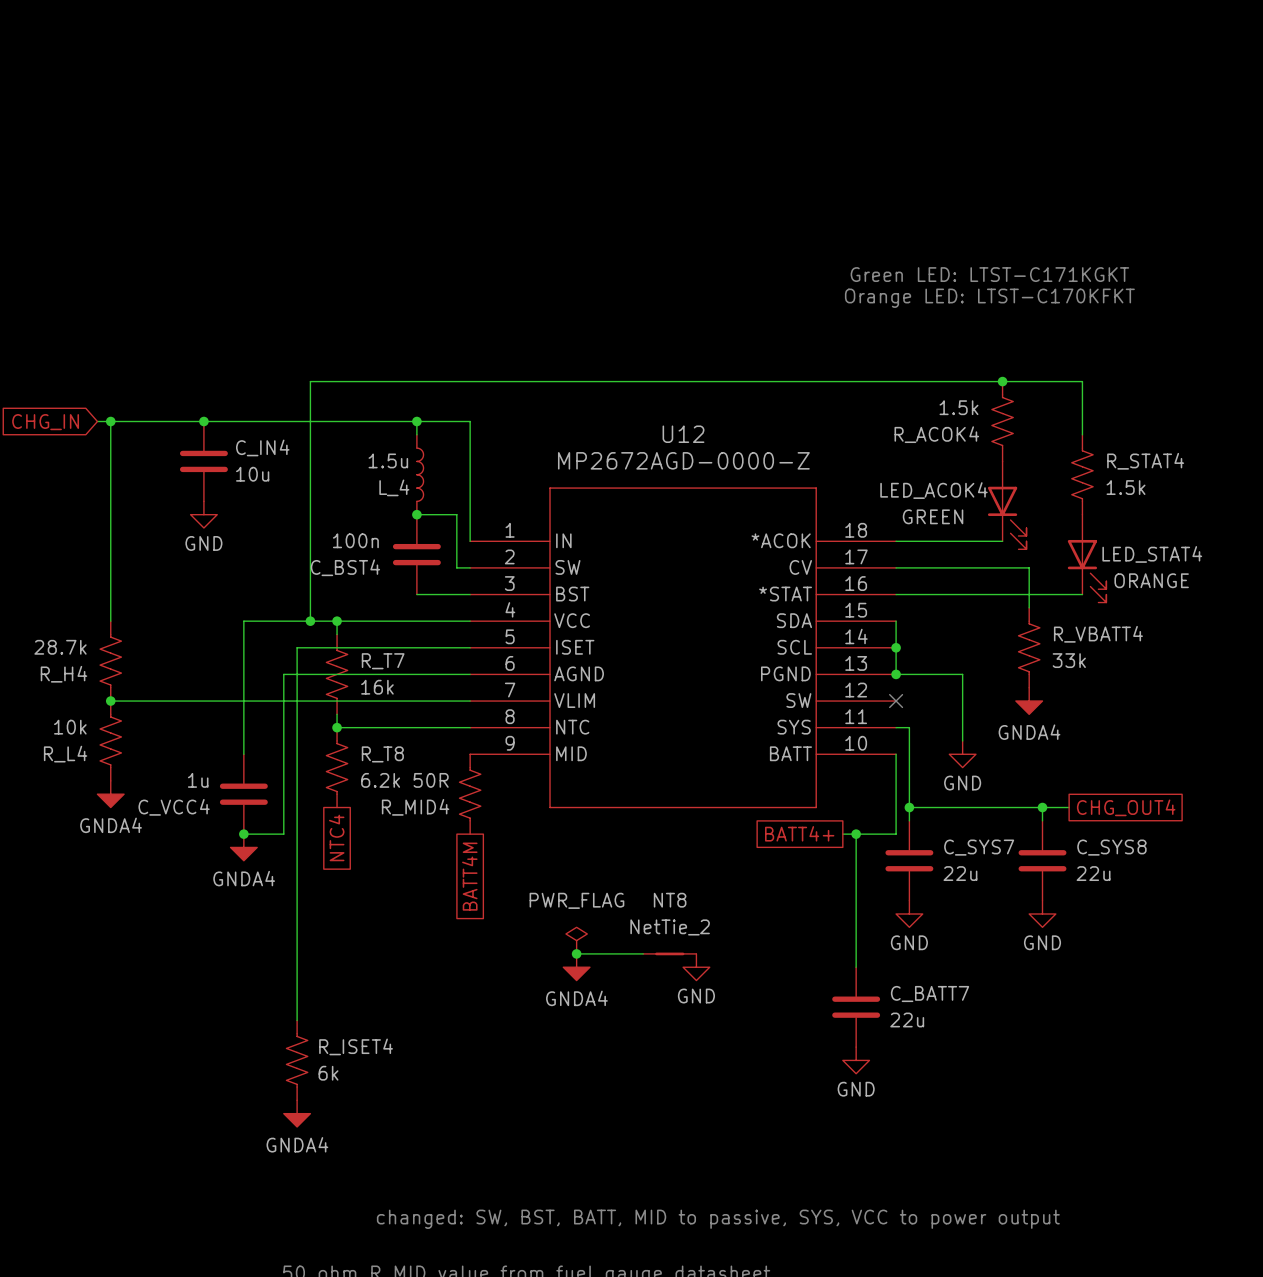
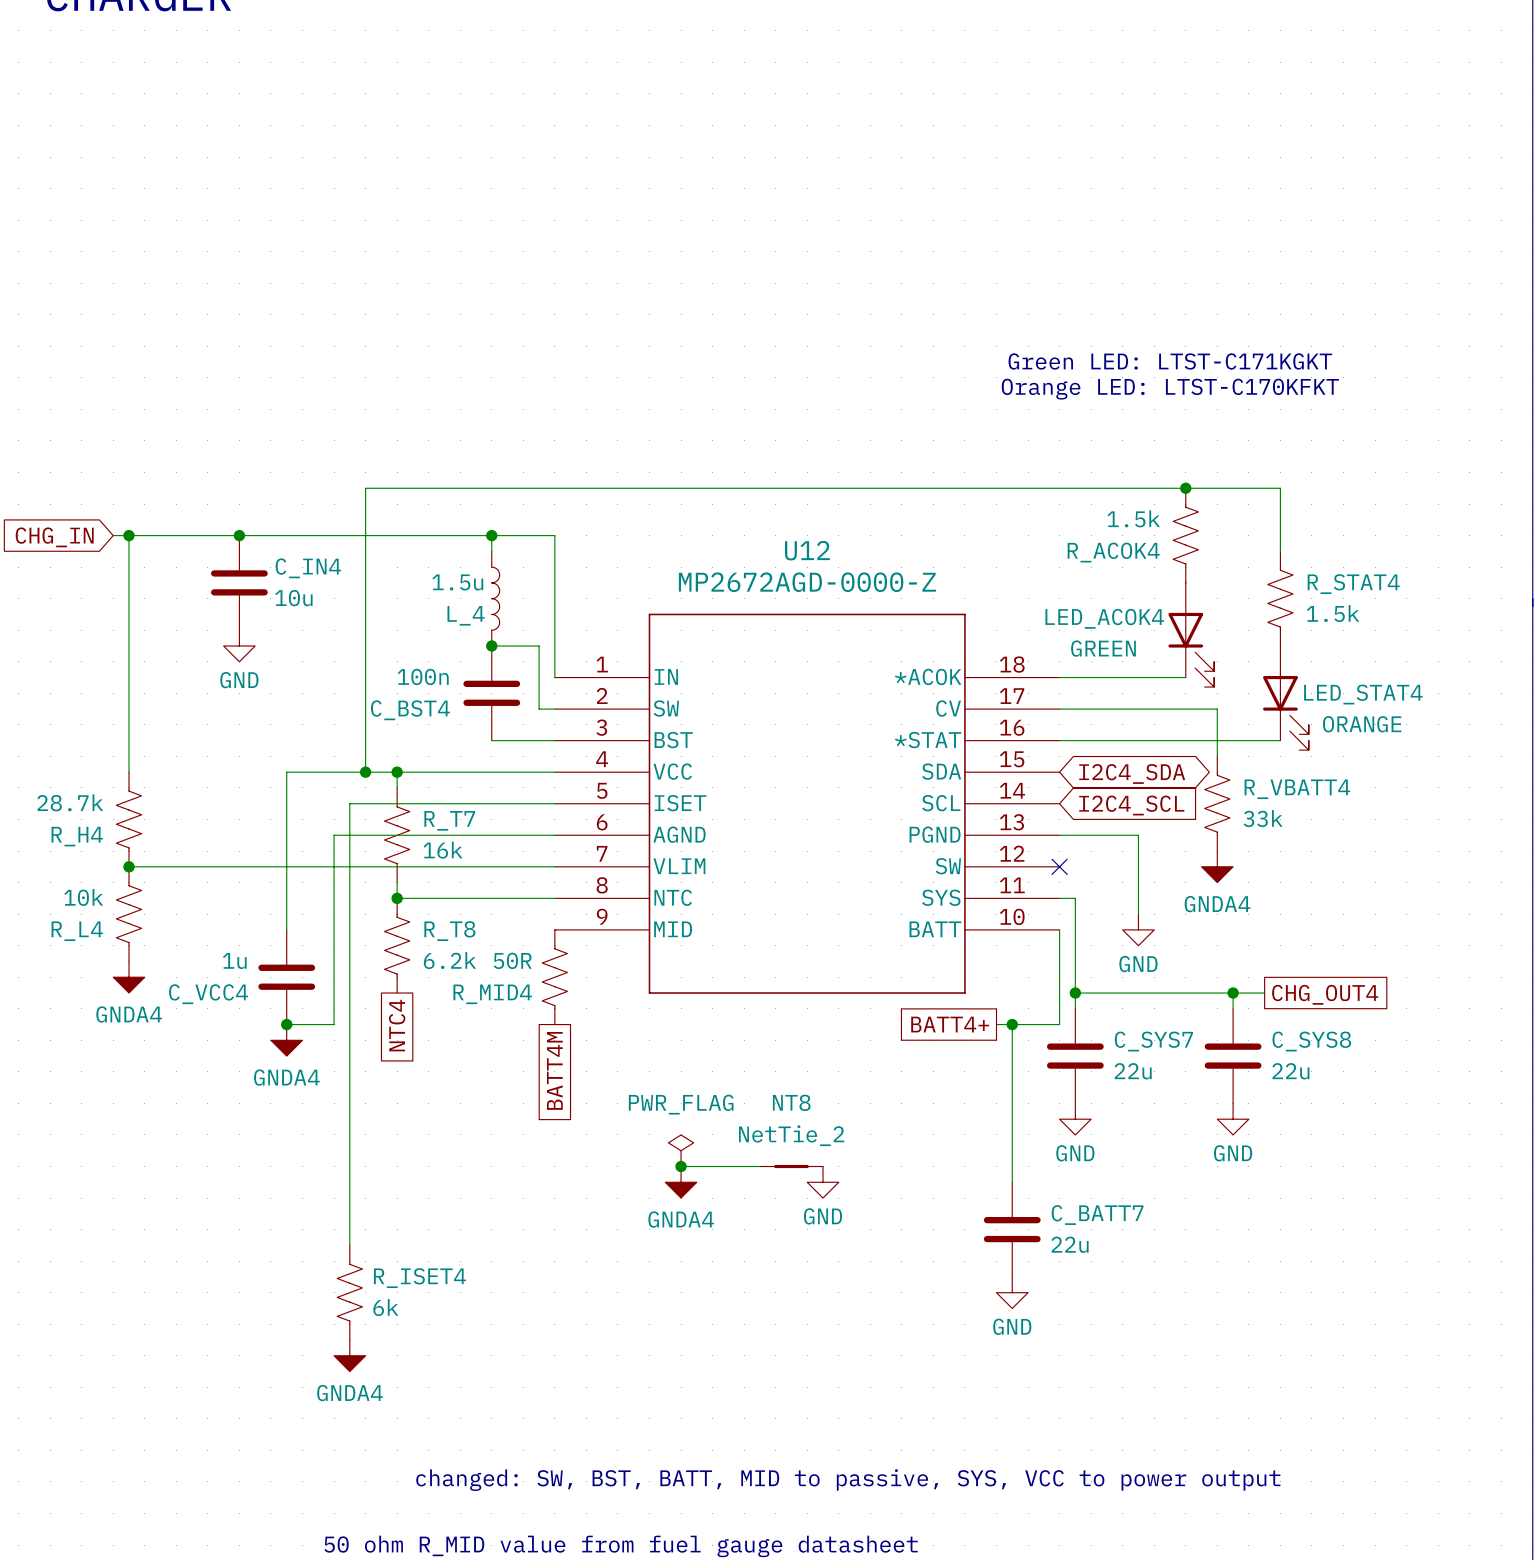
wire: (896, 621) (896, 674) -> none
global label: none -> I2C4_SDA (1132, 773)
junction: (896, 647) -> none
global label: none -> I2C4_SCL (1131, 805)
junction: (896, 674) -> none

